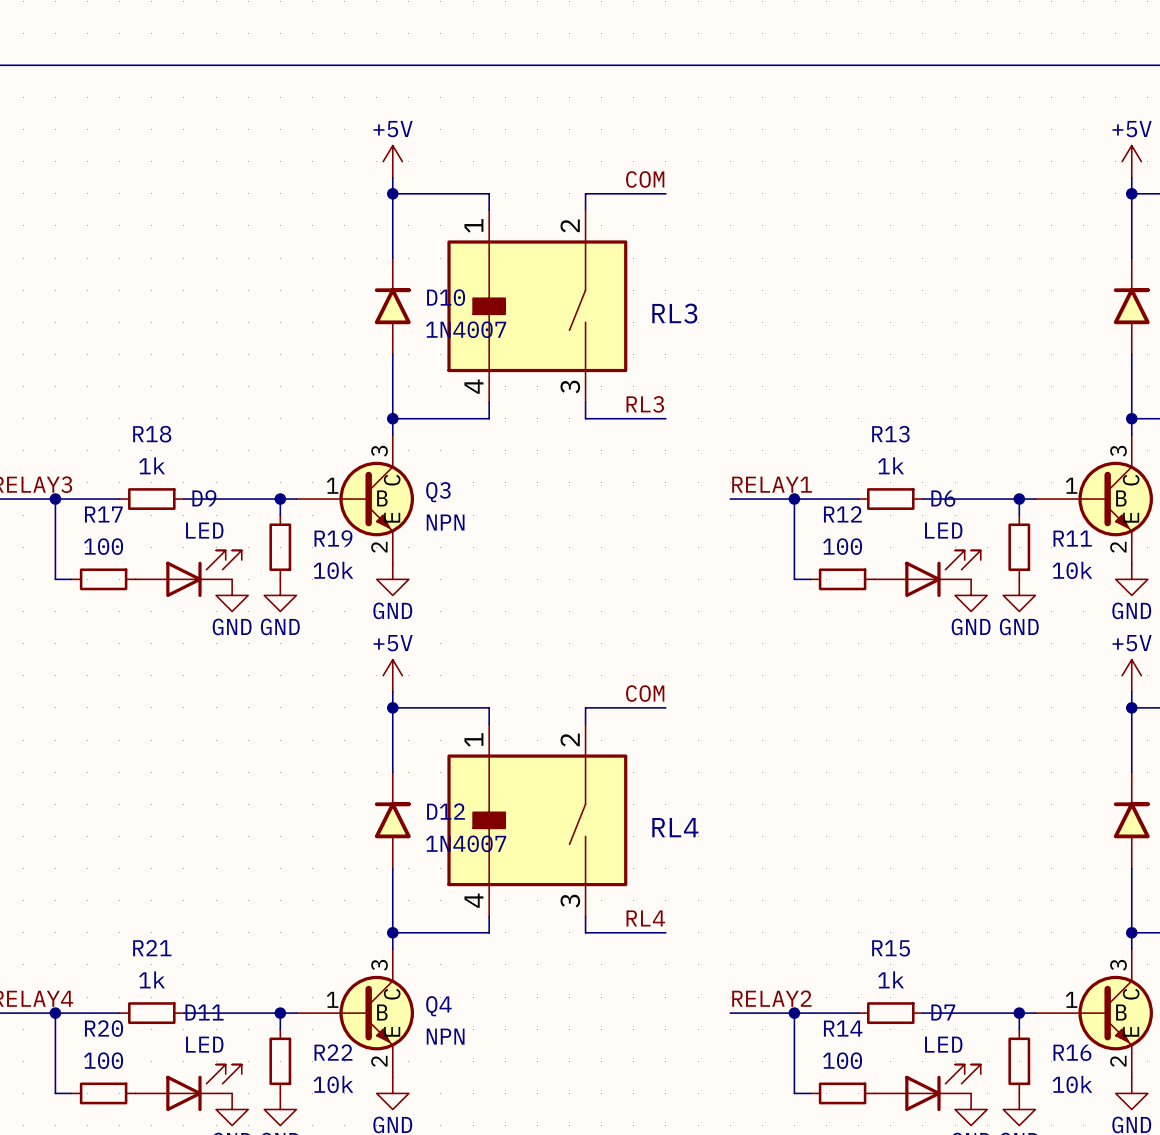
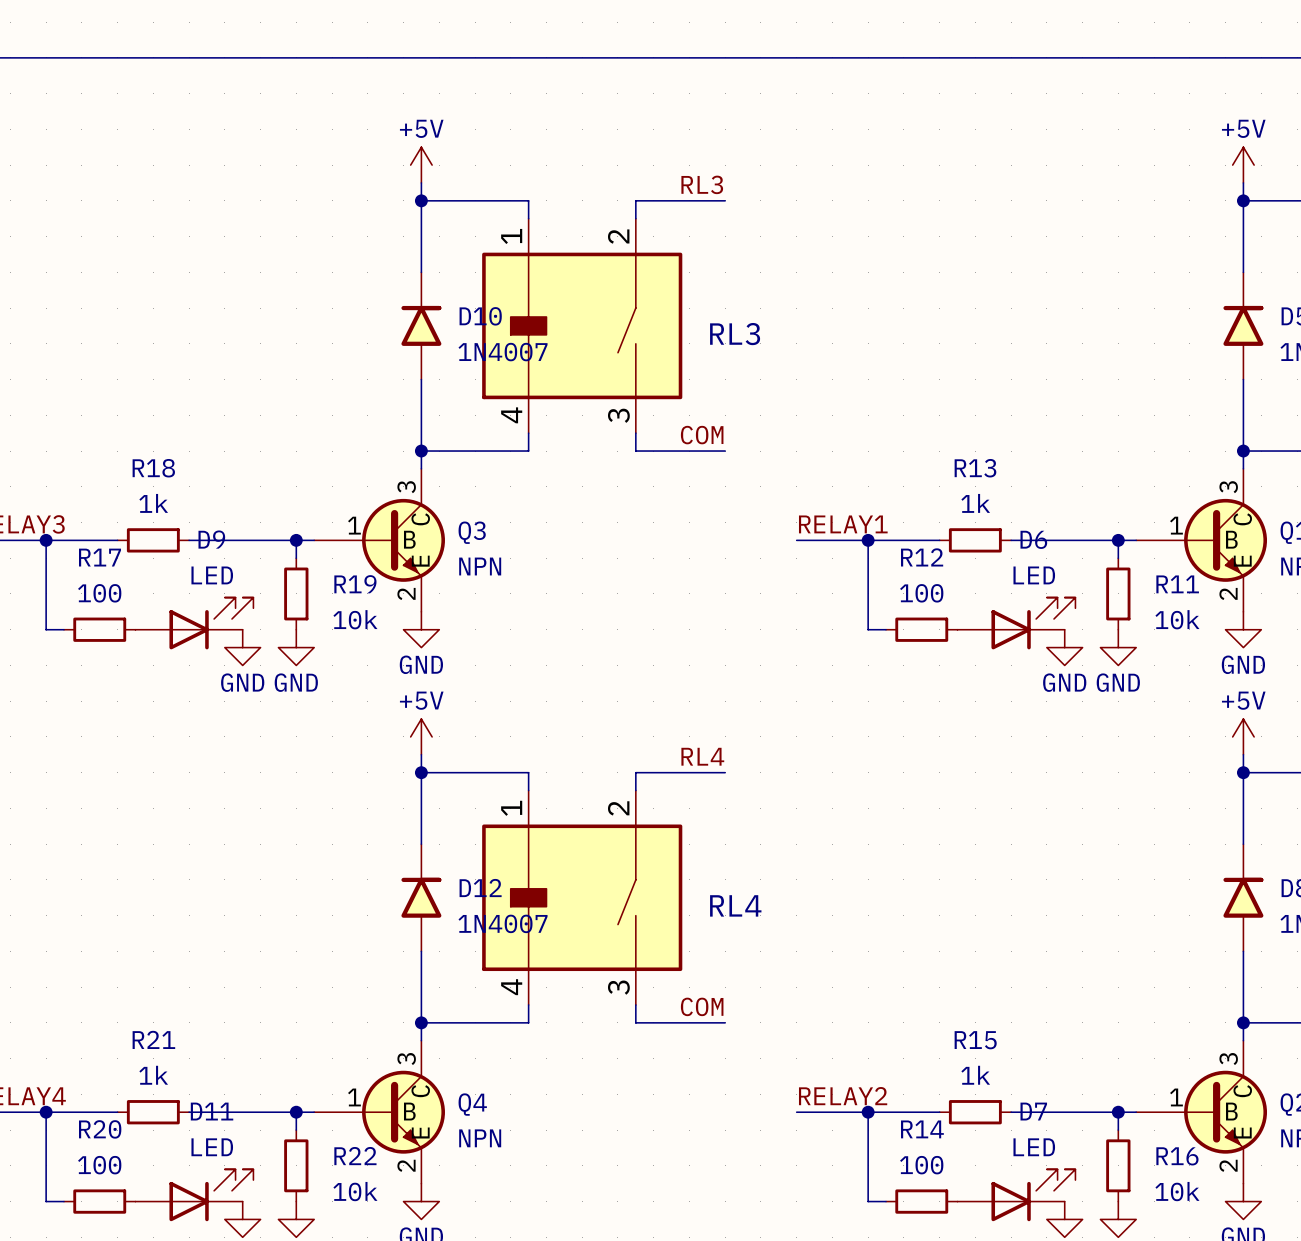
label: COM (645, 179) -> RL3 (702, 184)
label: RL3 (645, 404) -> COM (702, 435)
label: COM (645, 693) -> RL4 (702, 756)
label: RL4 (645, 918) -> COM (702, 1006)

